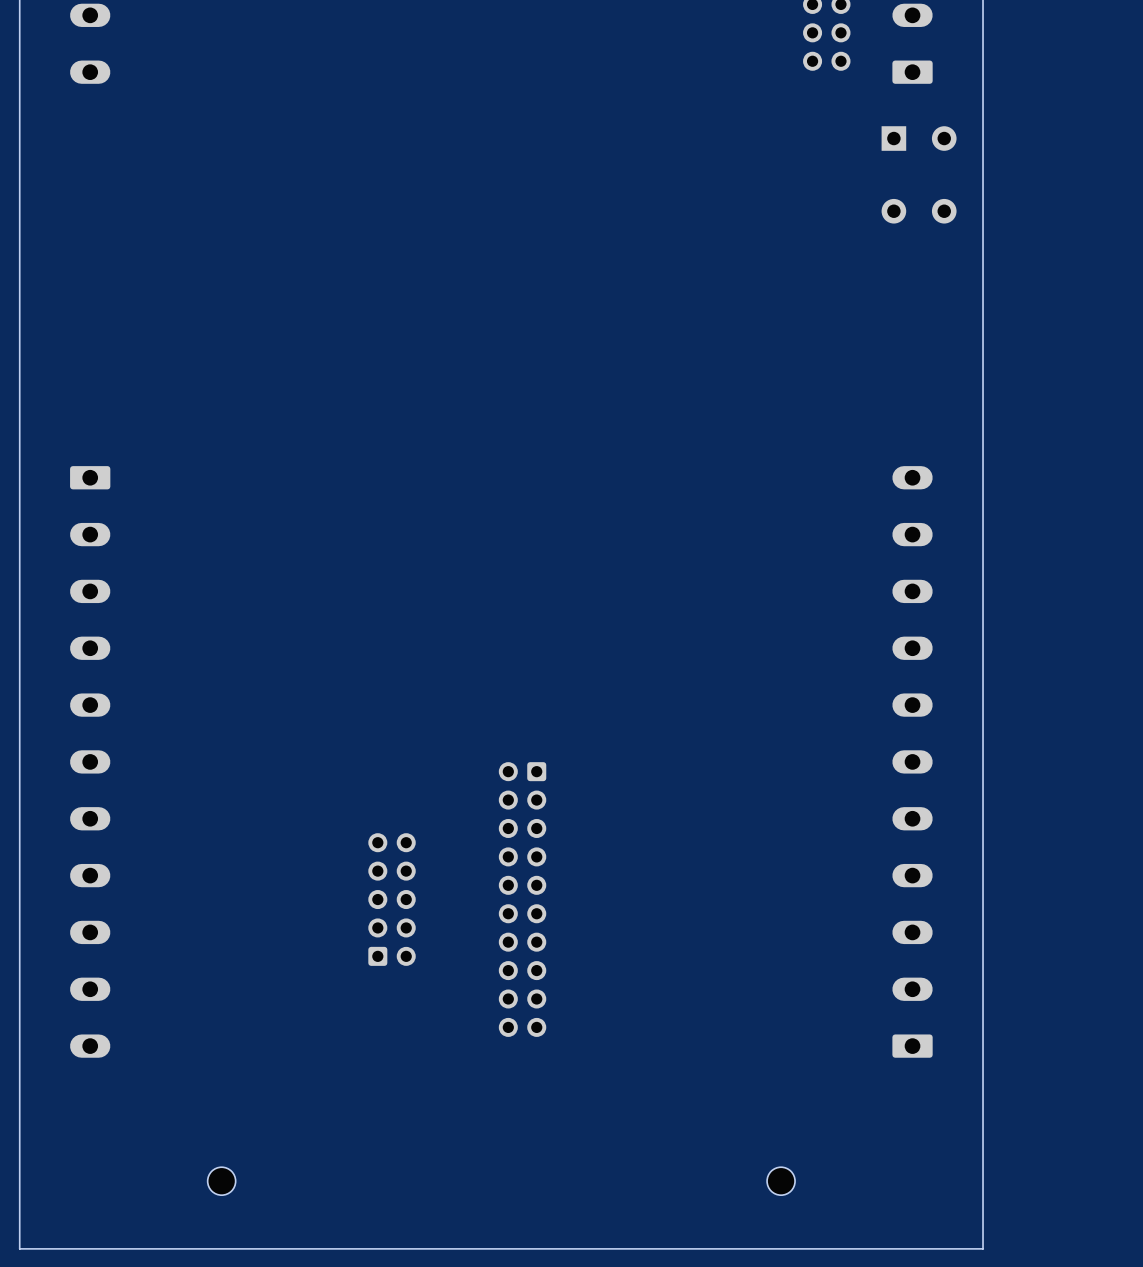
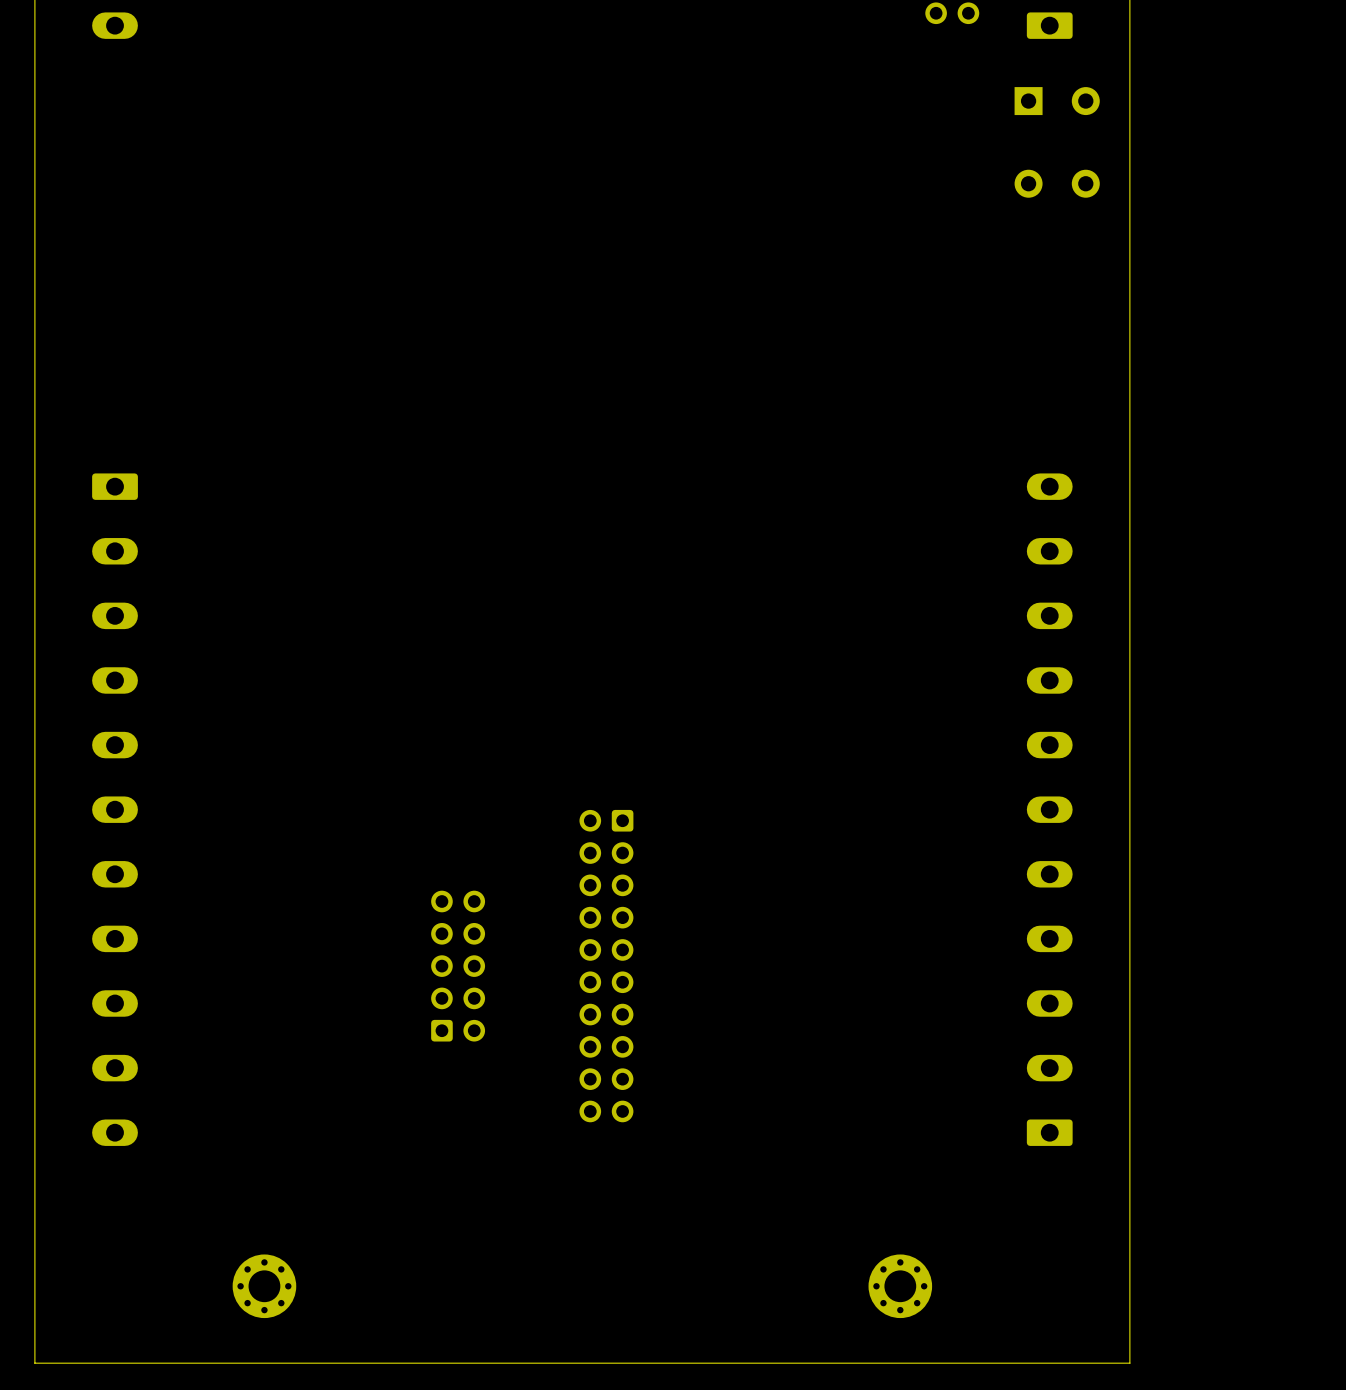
part footprint: [207, 1167, 236, 1196] -> [232, 1254, 297, 1319]
part footprint: [767, 1167, 796, 1196] -> [868, 1254, 933, 1319]

